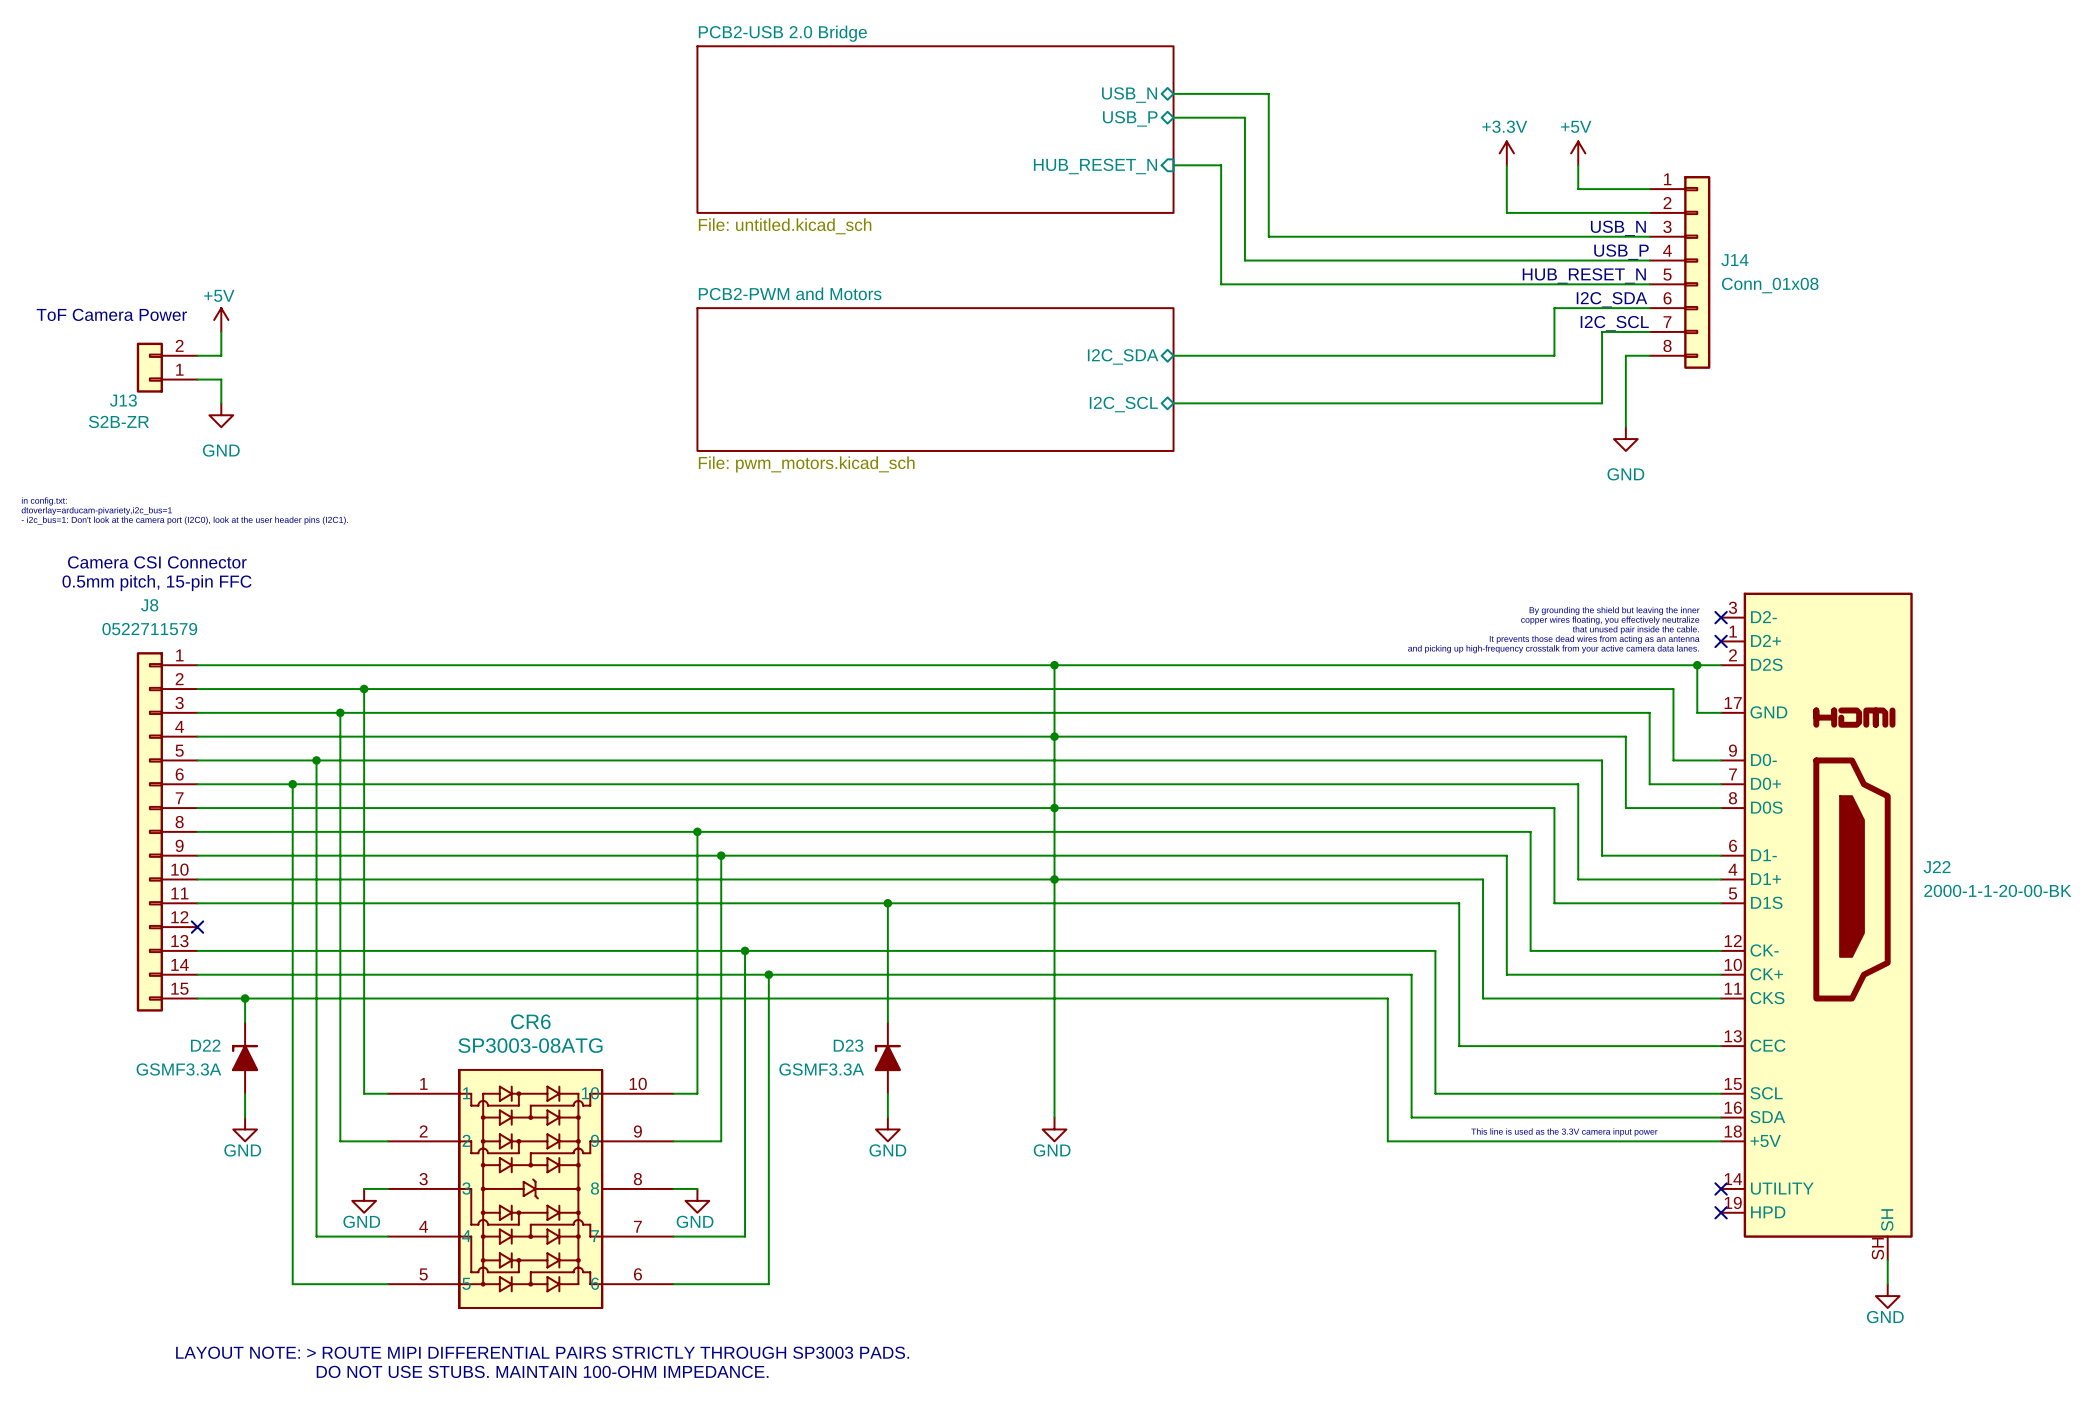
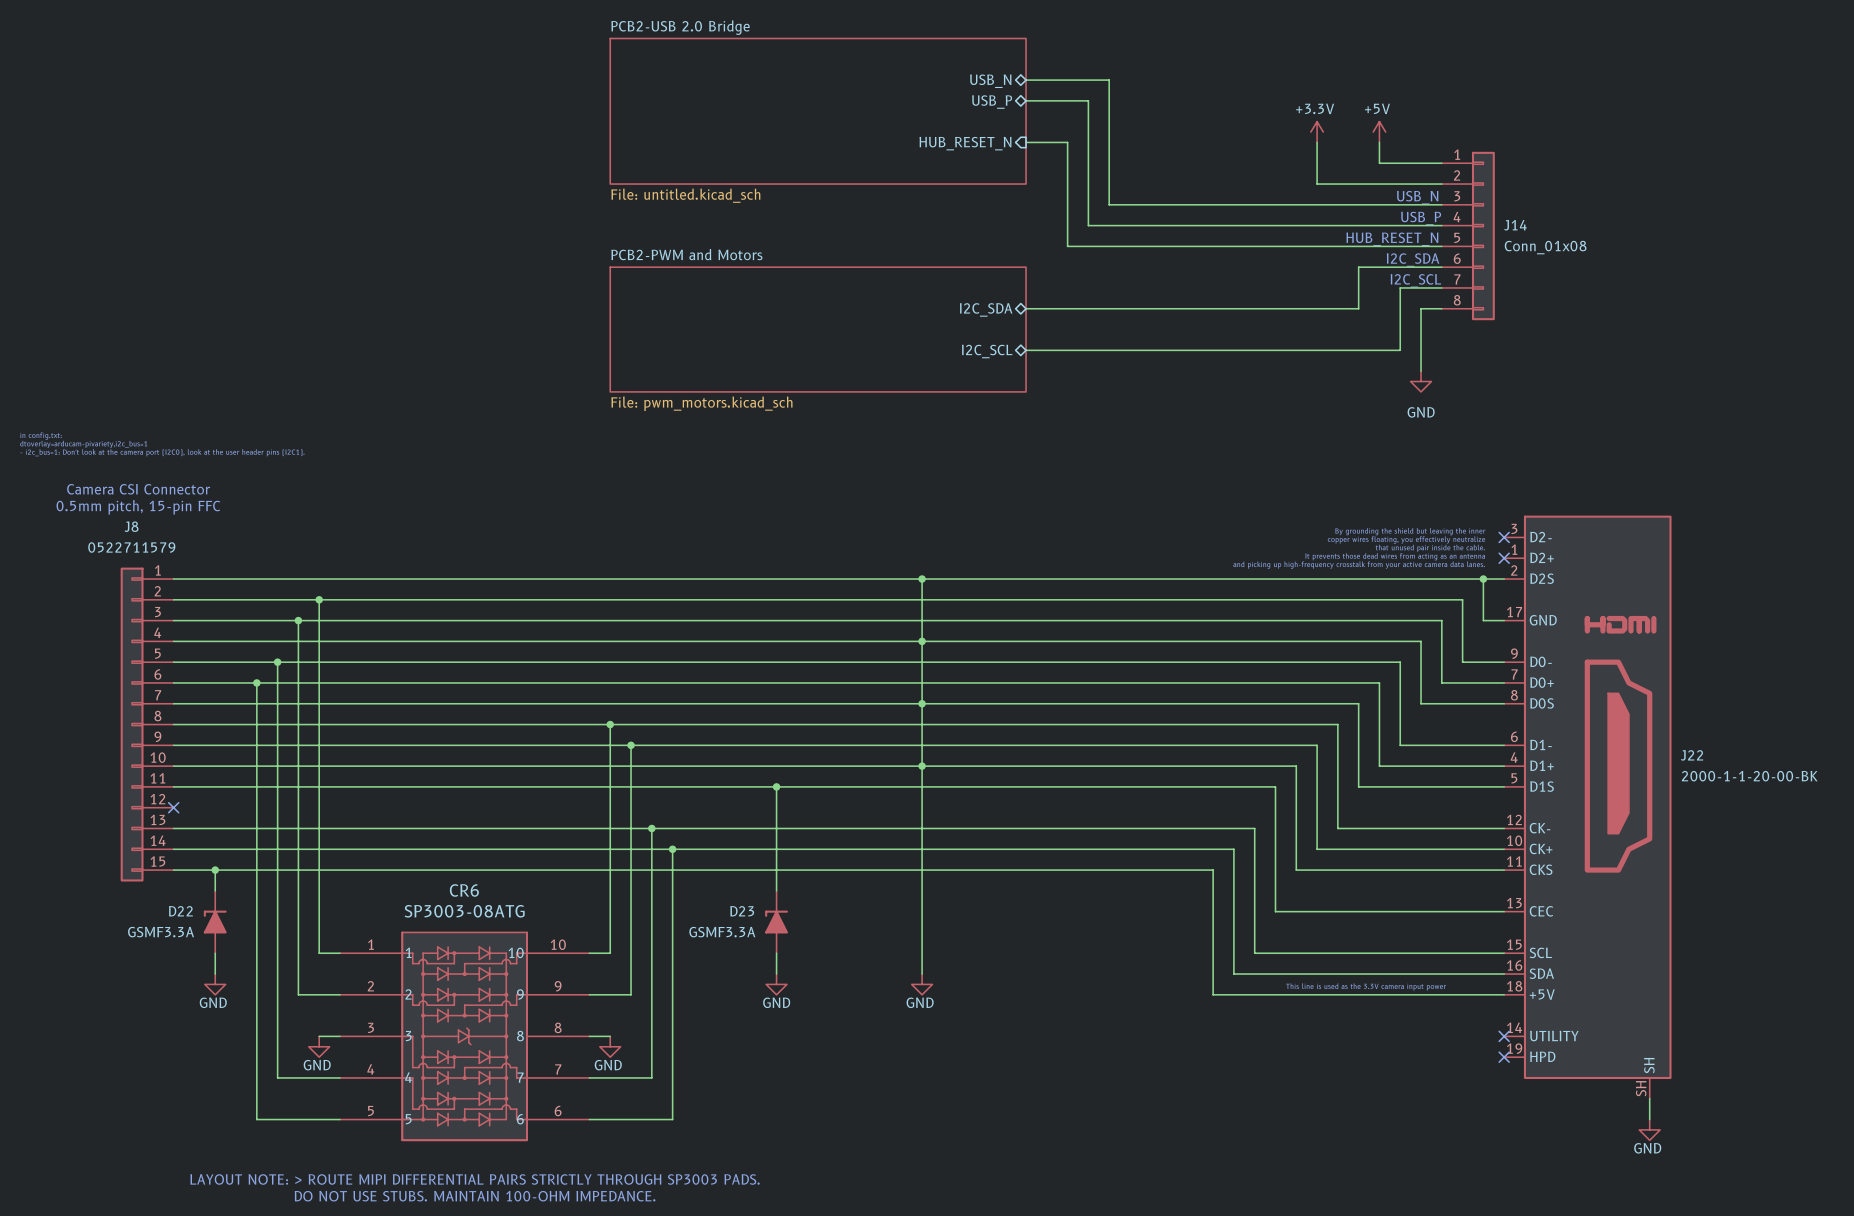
text: ToF Camera Power (111, 314) -> none
power symbol: +5V (221, 320) -> none
wire: (221, 331) (221, 355) (197, 355) -> none
J13: S2B-ZR (167, 367) -> none
wire: (197, 379) (221, 379) (221, 403) -> none
power symbol: GND (221, 415) -> none

